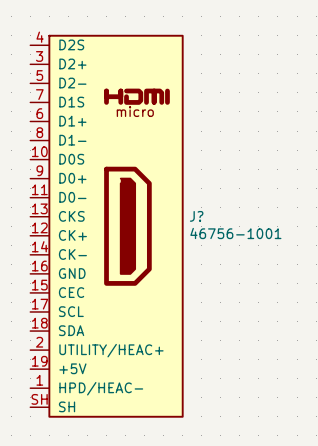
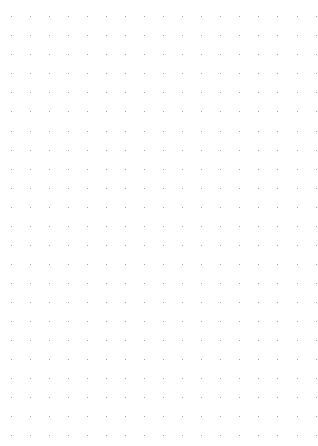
J?: 46756-1001 (106, 226) -> none

